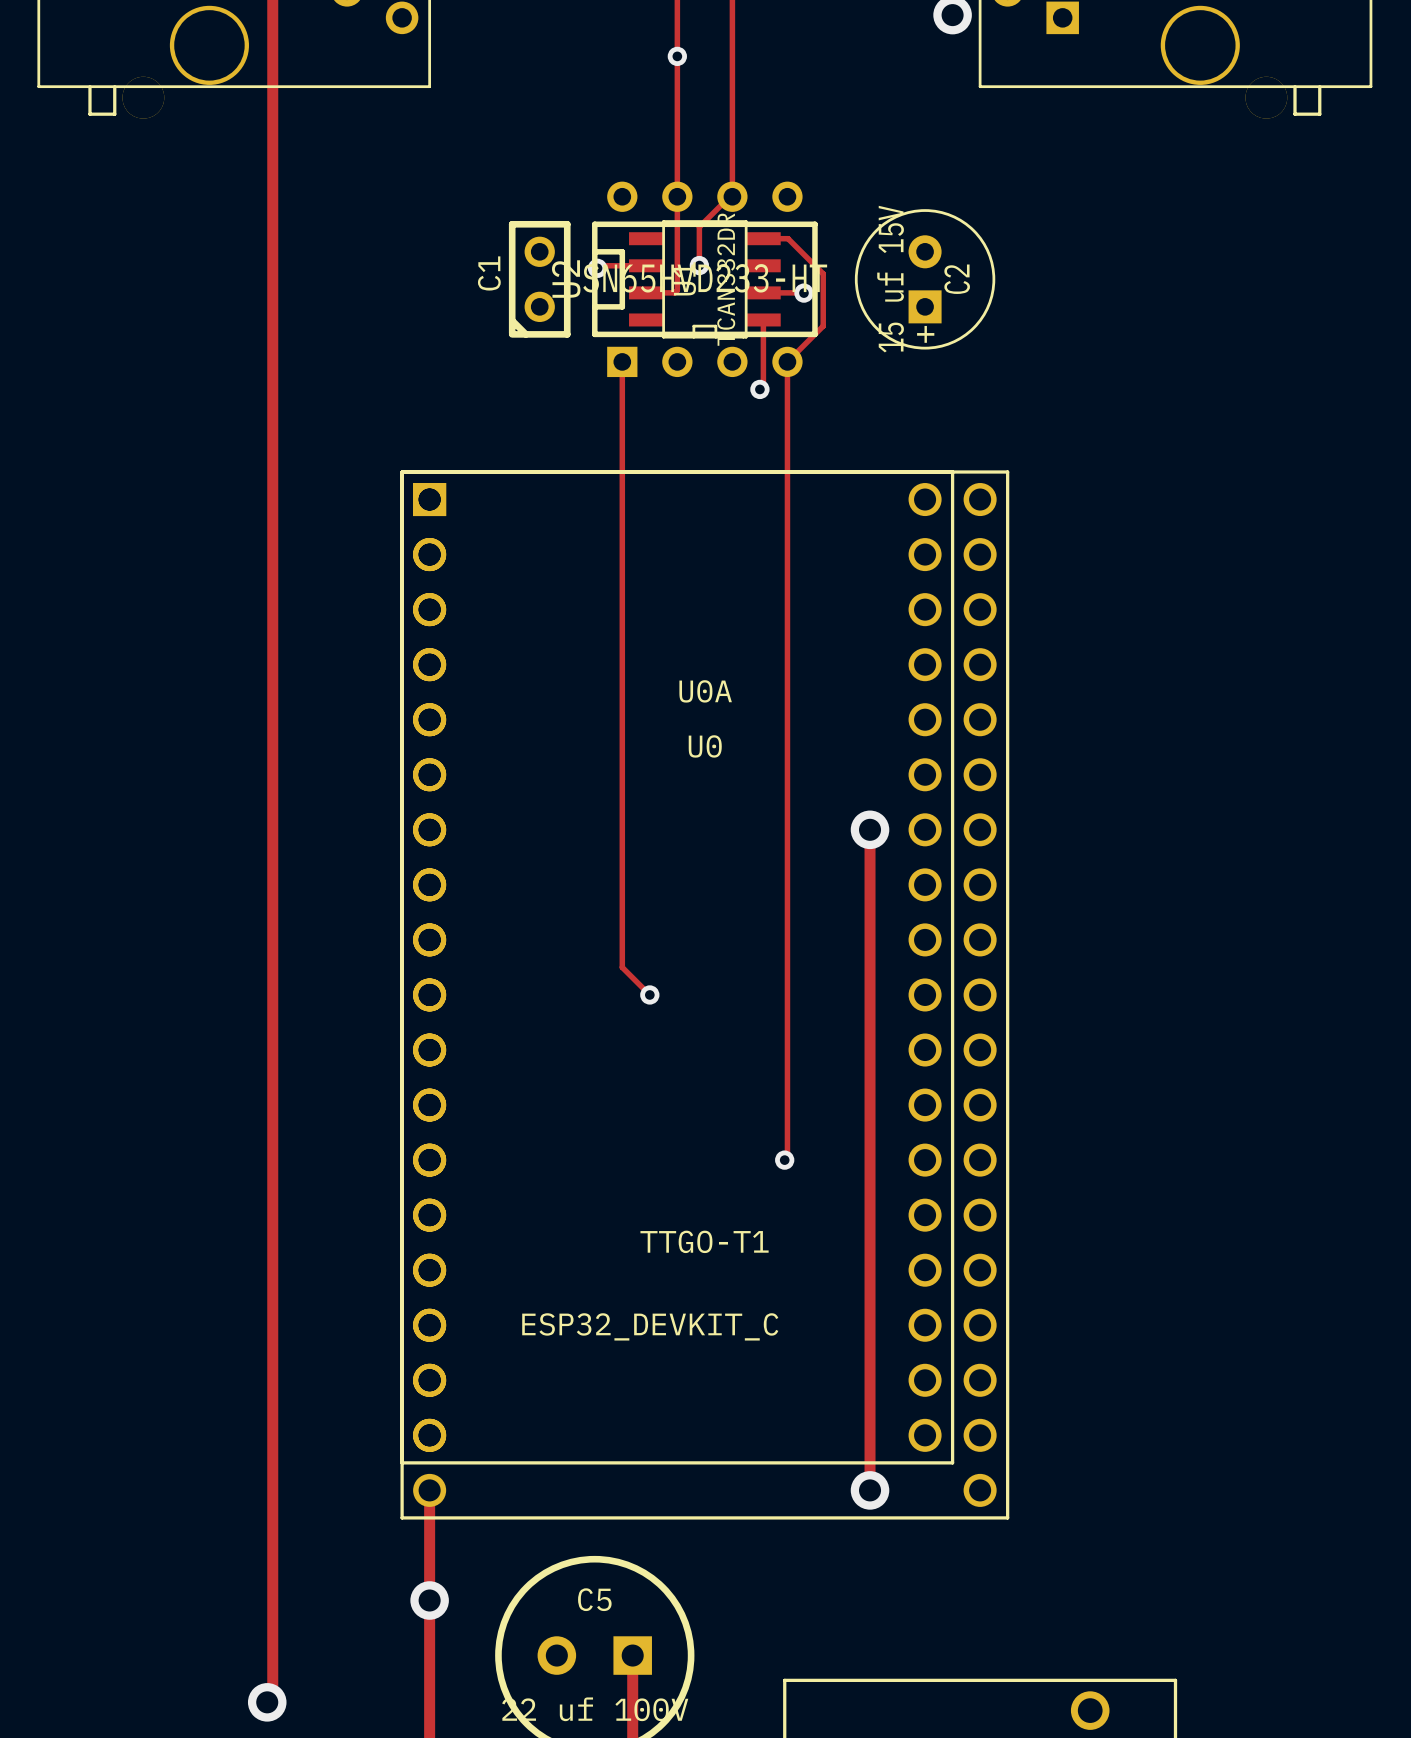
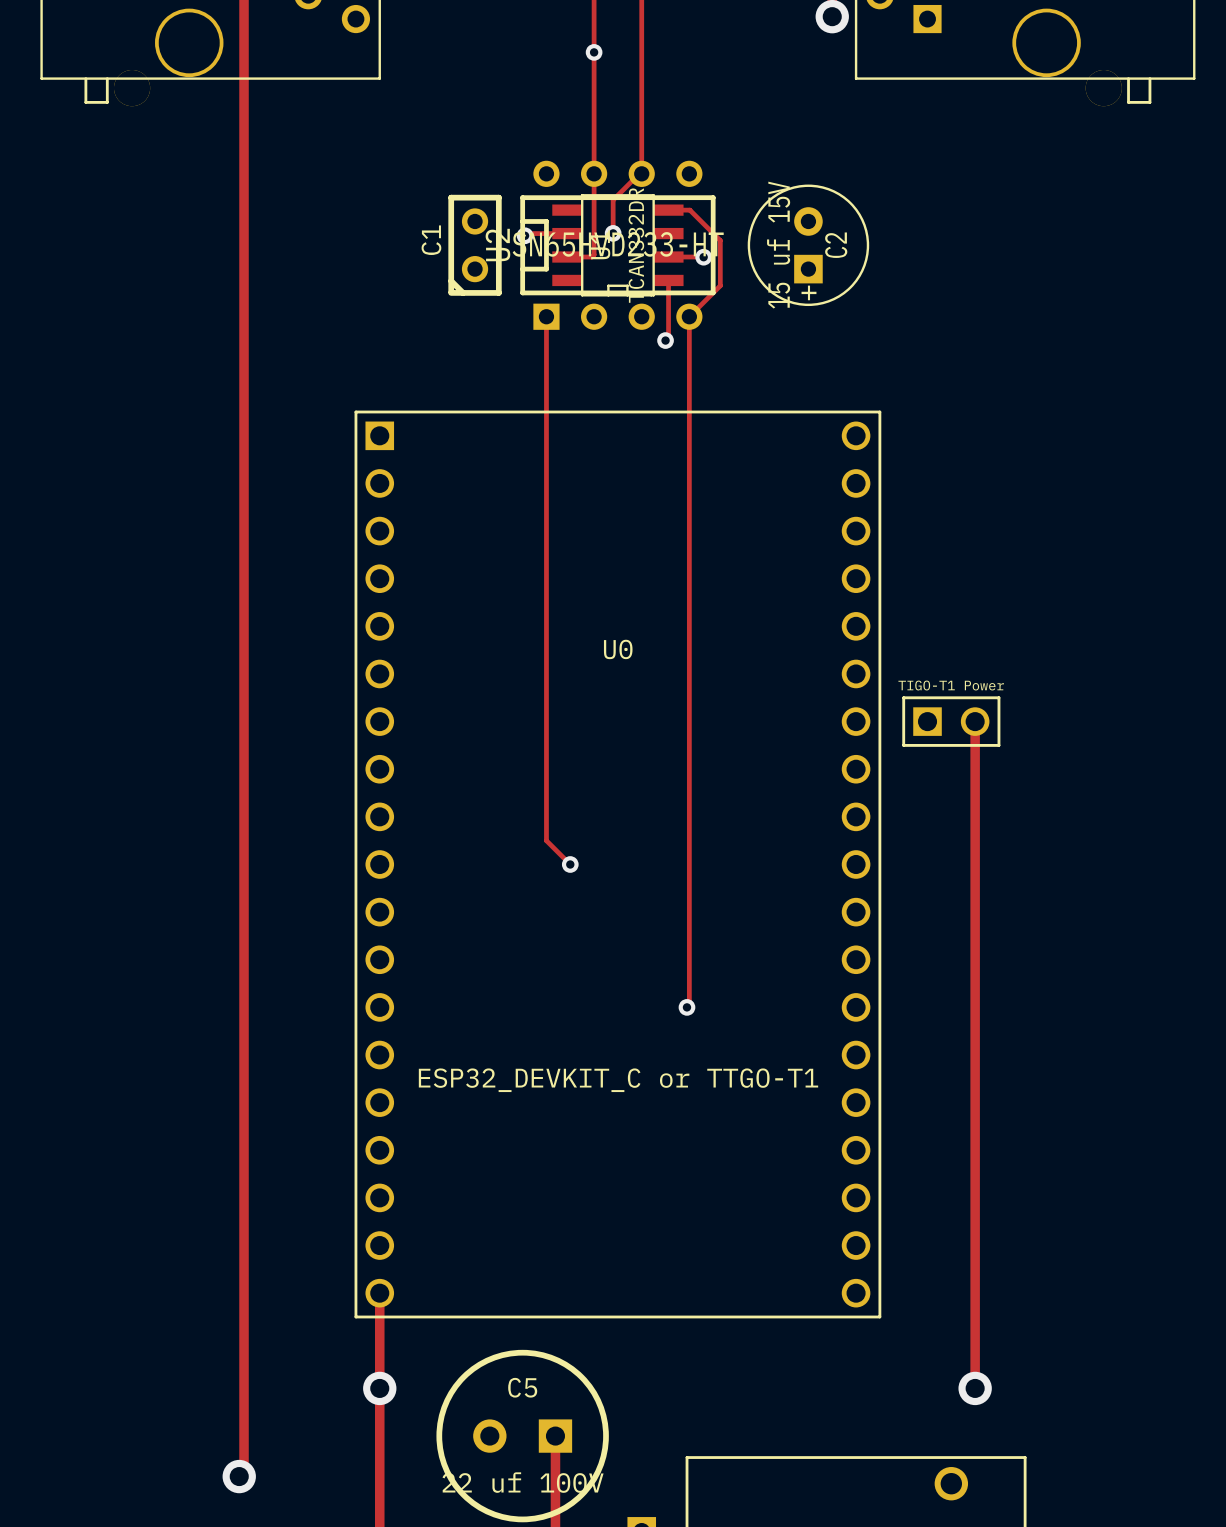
track: (870, 829) (870, 1490) -> none
via: (870, 829) -> none
part: none -> TIGO-T1 Power (951, 721)
track: none -> (975, 721) (975, 1388)
U0A: TTGO-T1 (677, 967) -> none
U0 value: ESP32_DEVKIT_C (650, 1326) -> ESP32_DEVKIT_C or TTGO-T1 (618, 1080)
via: (870, 1490) -> none
via: none -> (975, 1388)

